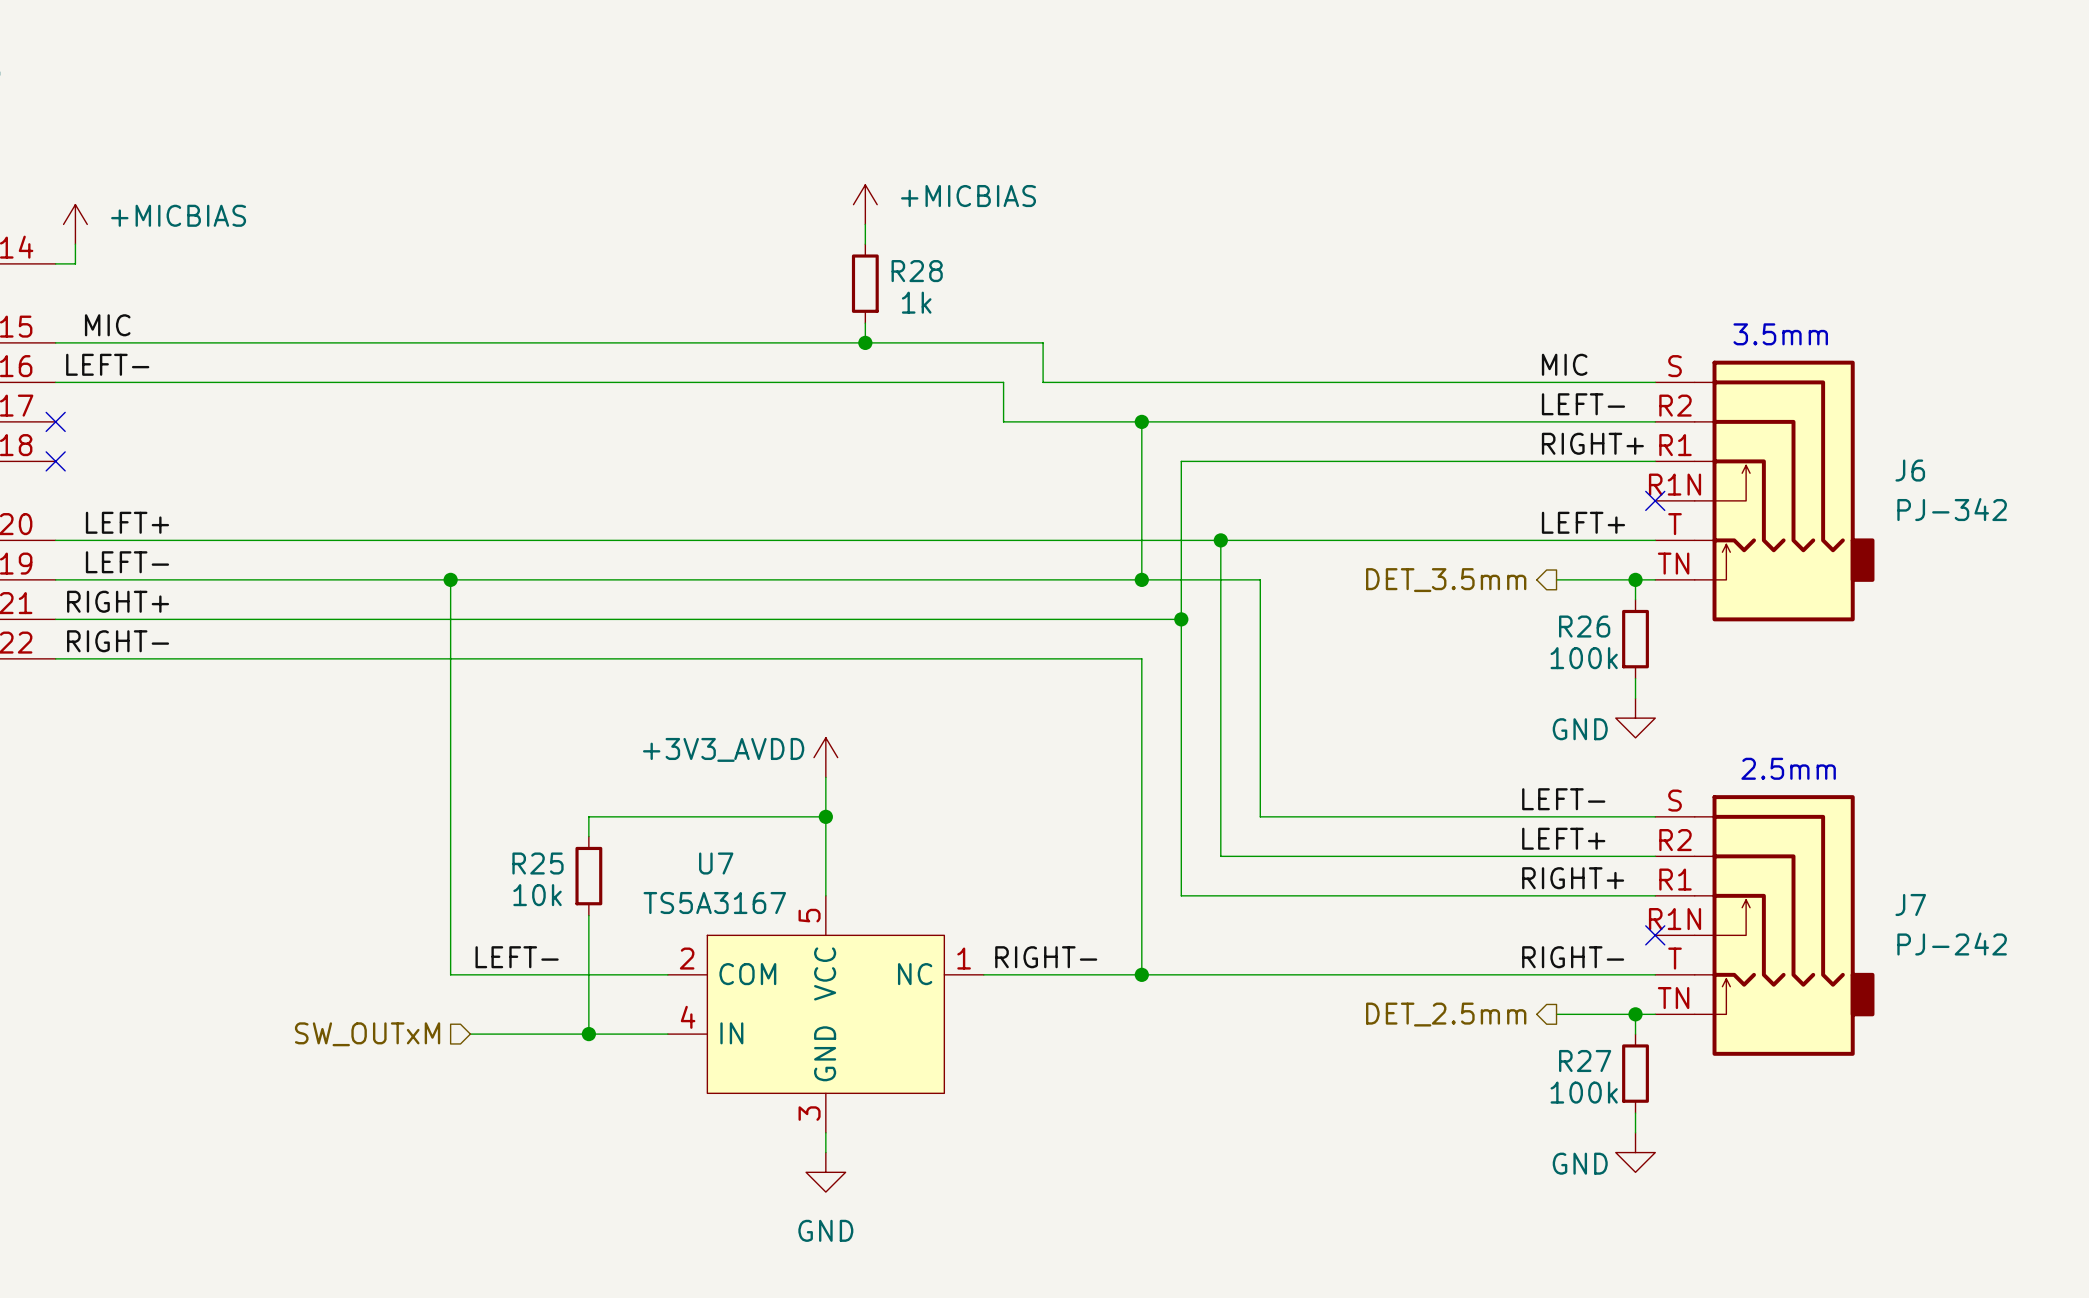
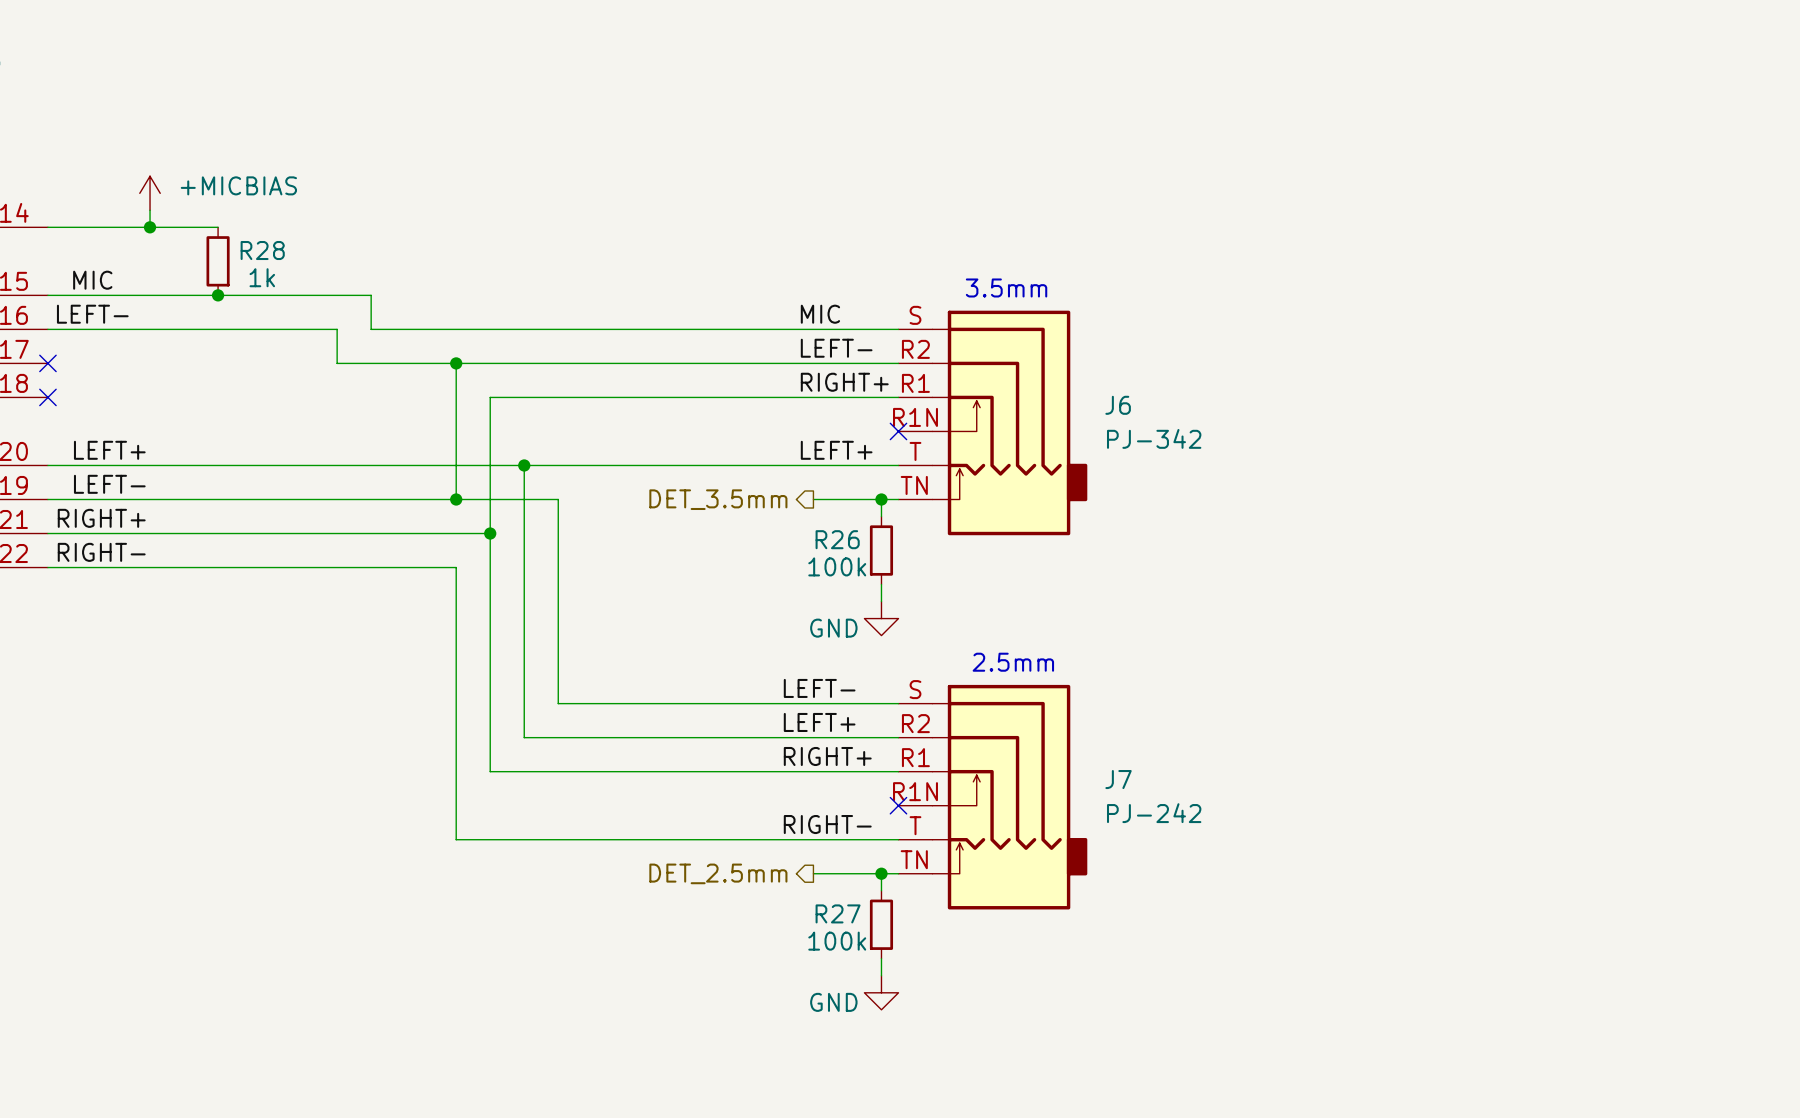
power symbol: +MICBIAS (865, 204) -> none
power symbol position: +MICBIAS (75, 224) -> +MICBIAS (150, 193)
wire: (865, 224) (865, 244) -> none
wire: (75, 244) (75, 263) -> (218, 227) (64, 227)
wire: none -> (150, 210) (150, 227)
junction: none -> (150, 227)
R28 position: (865, 283) -> (218, 261)
wire: (865, 323) (865, 342) -> (881, 499) (881, 516)
text: none -> 3.5mm (1006, 287)
text: 3.5mm (1780, 334) -> none
junction: none -> (218, 295)
wire: (430, 342) (1043, 342) (1043, 382) (1655, 382) -> none
junction: (865, 342) -> none
label: none -> MIC (820, 314)
label: MIC (1564, 364) -> none
wire: (391, 382) (430, 382) -> (371, 295) (371, 329)
wire: none -> (337, 329) (337, 363) (864, 363)
wire: (1003, 382) (1003, 421) -> (864, 329) (898, 329)
label: none -> LEFT- (836, 348)
label: LEFT- (1583, 404) -> none
wire: none -> (456, 363) (456, 499)
junction: none -> (456, 363)
wire: (1043, 421) (1655, 421) -> none
junction: (1141, 421) -> none
label: none -> RIGHT+ (844, 382)
label: RIGHT+ (1592, 443) -> none
wire: none -> (898, 397) (490, 397) (490, 771) (898, 771)
wire: (1655, 461) (1181, 461) (1181, 895) (1655, 895) -> none
J6 position: (1764, 491) -> (992, 422)
no-connect mark: none -> (898, 431)
no-connect mark: (1655, 500) -> none
label: none -> LEFT+ (836, 450)
label: LEFT+ (1583, 522) -> none
wire: none -> (524, 465) (524, 737) (898, 737)
junction: none -> (524, 465)
wire: (1043, 540) (1655, 540) -> none
wire: (1220, 540) (1220, 856) (1655, 856) -> none
junction: (1220, 540) -> none
wire: (450, 579) (450, 974) (529, 974) -> (456, 567) (456, 839)
junction: (450, 579) -> none
junction: none -> (456, 499)
wire: (648, 579) (944, 579) -> none
junction: none -> (881, 499)
wire: (1043, 579) (1260, 579) (1260, 816) (1655, 816) -> none
junction: (1141, 579) -> none
wire: (1556, 579) (1655, 579) -> none
wire: (1635, 579) (1635, 599) -> none
junction: (1635, 579) -> none
hierarchical label: none -> DET_3.5mm (718, 499)
hierarchical label: DET_3.5mm (1446, 580) -> none
wire: (569, 619) (1181, 619) -> none
junction: none -> (490, 533)
junction: (1181, 619) -> none
R26 position: (1635, 639) -> (881, 550)
wire: (529, 658) (1141, 658) (1141, 974) -> none
wire: none -> (881, 584) (881, 601)
wire: (1635, 678) (1635, 698) -> none
power symbol: none -> GND (881, 618)
power symbol: GND (1635, 718) -> none
power symbol: +3V3_AVDD (825, 757) -> none
text: none -> 2.5mm (1013, 662)
text: 2.5mm (1788, 768) -> none
wire: (825, 777) (825, 895) -> none
label: none -> LEFT- (819, 688)
label: LEFT- (1563, 799) -> none
wire: (648, 816) (588, 816) (588, 836) -> (558, 703) (558, 499)
wire: none -> (711, 703) (898, 703)
junction: (825, 816) -> none
label: none -> LEFT+ (819, 722)
label: LEFT+ (1563, 838) -> none
R25: 10k (588, 876) -> none
label: none -> RIGHT+ (827, 756)
label: RIGHT+ (1573, 878) -> none
wire: (588, 915) (588, 1034) -> none
J7 position: (1764, 925) -> (992, 797)
no-connect mark: none -> (898, 805)
no-connect mark: (1655, 935) -> none
label: LEFT- (517, 957) -> none
label position: RIGHT- (1046, 957) -> RIGHT- (827, 824)
label: RIGHT- (1573, 957) -> none
wire: (1043, 974) (1655, 974) -> none
junction: (1141, 974) -> none
U7: TS5A3167 (825, 1014) -> none
hierarchical label: none -> DET_2.5mm (718, 873)
wire: none -> (813, 873) (898, 873)
wire: none -> (881, 873) (881, 890)
junction: none -> (881, 873)
hierarchical label: DET_2.5mm (1446, 1014) -> none
wire: (1556, 1014) (1655, 1014) -> none
wire: (1635, 1014) (1635, 1034) -> none
junction: (1635, 1014) -> none
hierarchical label: SW_OUTxM (367, 1034) -> none
wire: (470, 1034) (667, 1034) -> none
junction: (588, 1034) -> none
R27 position: (1635, 1073) -> (881, 924)
wire: (1635, 1113) (1635, 1132) -> none
wire: (825, 1132) (825, 1152) -> (881, 958) (881, 975)
power symbol: GND (1635, 1152) -> none
power symbol position: GND (825, 1172) -> GND (881, 992)
power symbol text position: GND (825, 1230) -> GND (833, 1002)

